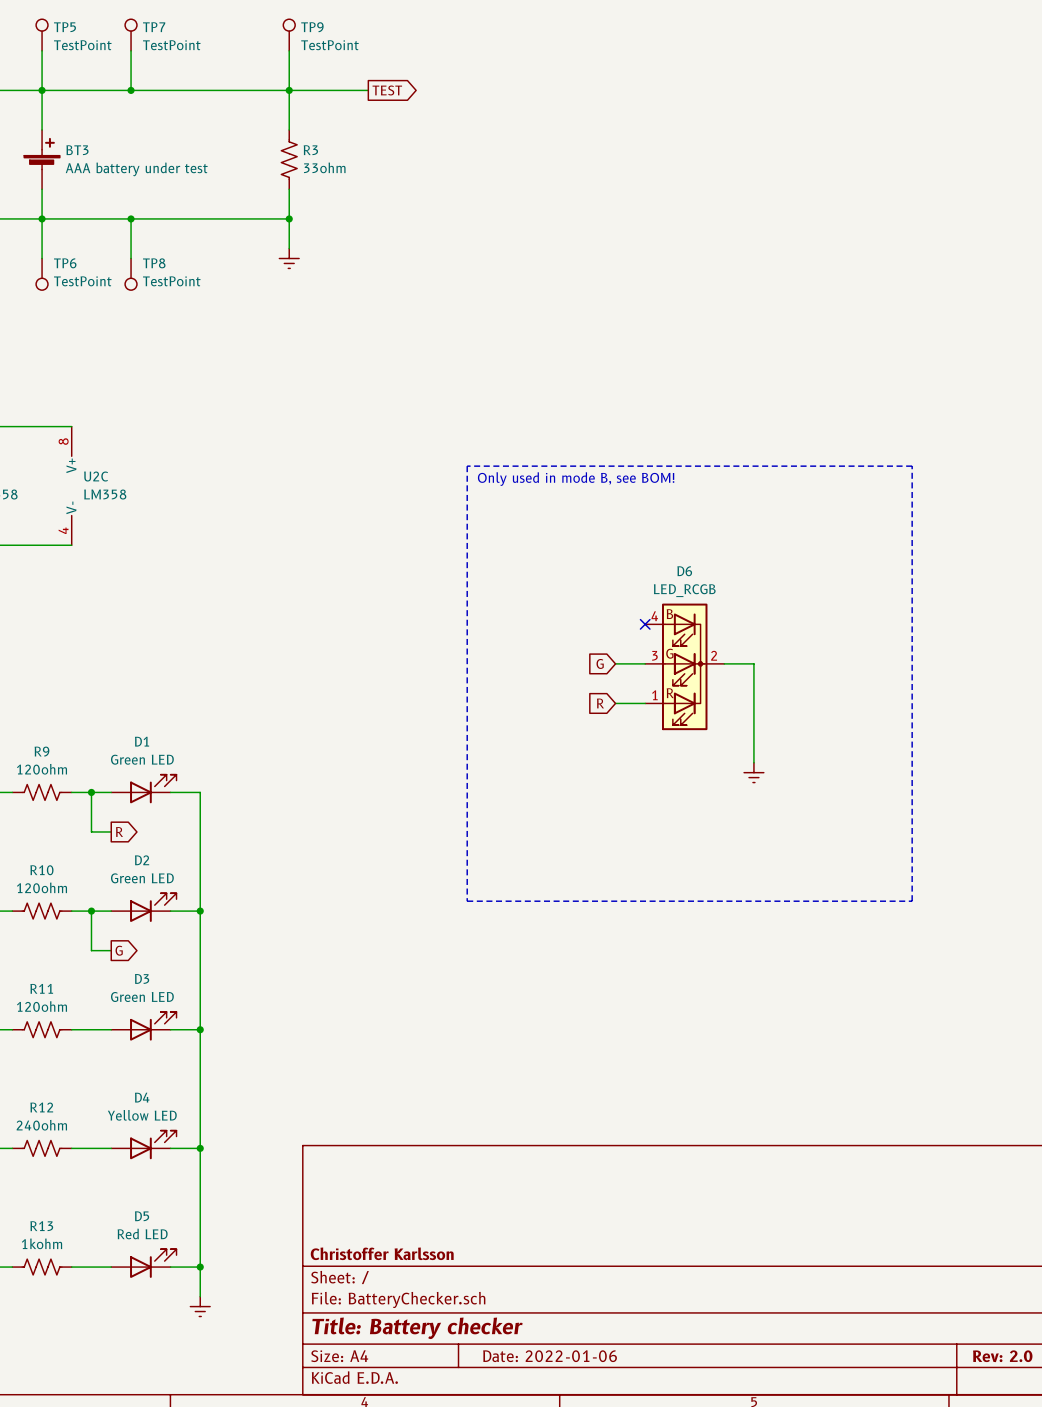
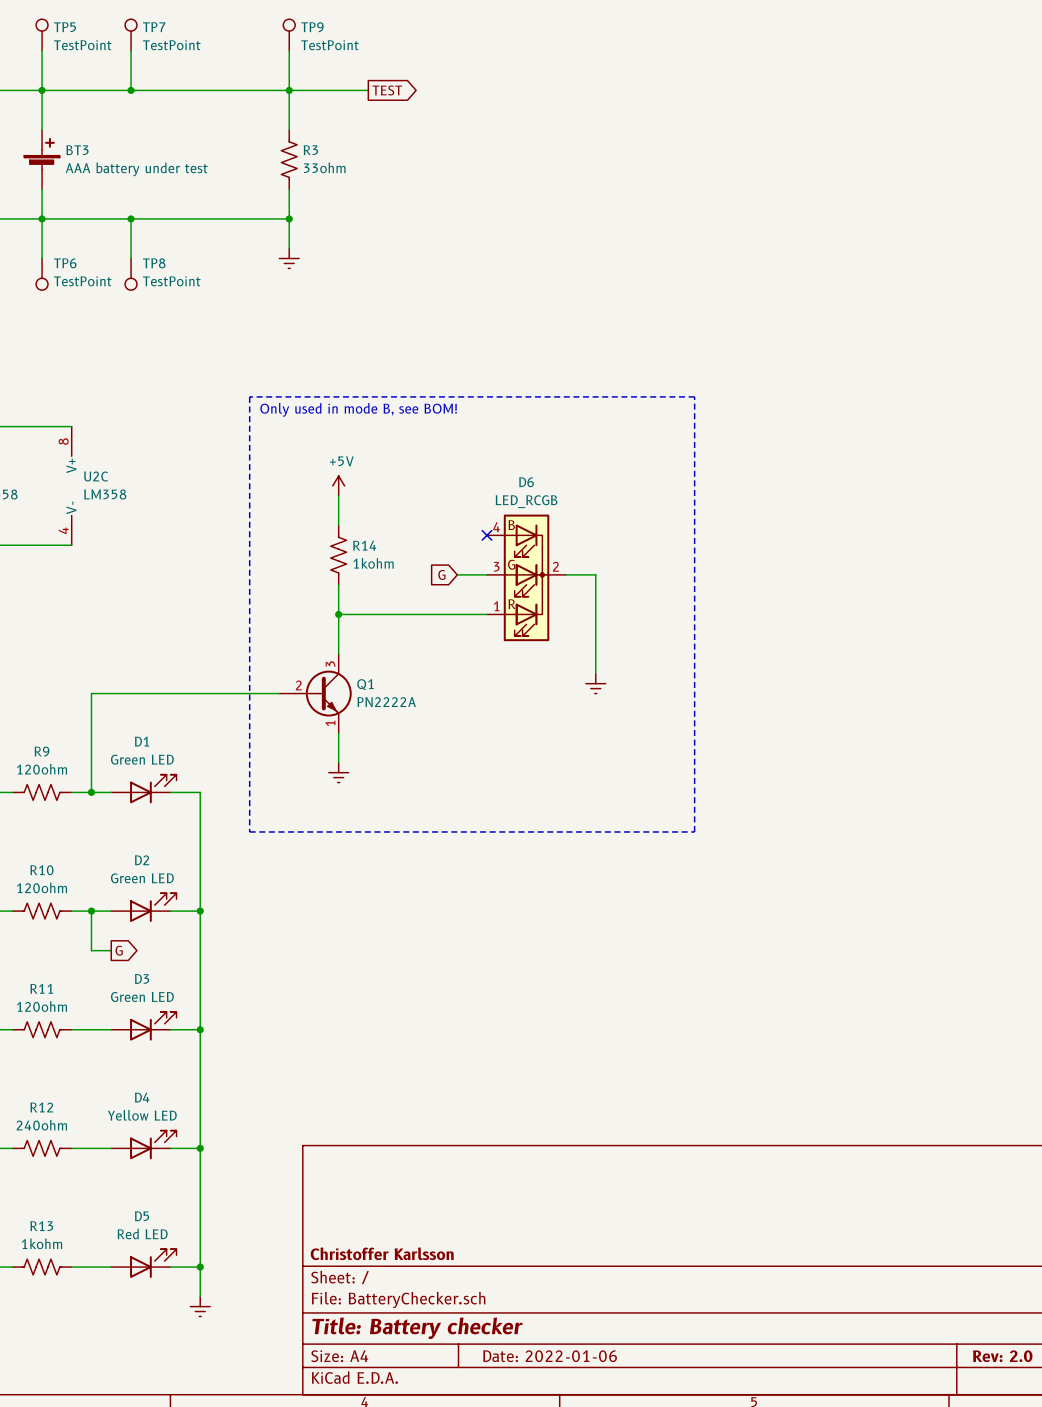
line: none -> (249, 396) (694, 396) (694, 831) (249, 831) (249, 396)
text: none -> Only used in mode B, see BOM! (358, 409)
line: (467, 466) (912, 466) (912, 901) (467, 901) (467, 466) -> none
text: Only used in mode B, see BOM! (576, 479) -> none
power symbol: none -> +5V (338, 485)
wire: none -> (338, 495) (338, 525)
no-connect mark: none -> (486, 535)
R14: none -> 1kohm (338, 555)
wire: none -> (338, 584) (338, 654)
wire: none -> (338, 614) (486, 614)
junction: none -> (338, 614)
no-connect mark: (645, 624) -> none
global label position: G (600, 663) -> G (441, 574)
wire: (615, 663) (645, 663) -> (457, 574) (486, 574)
wire: (724, 663) (753, 663) (753, 762) -> (566, 574) (595, 574) (595, 673)
D6 position: (684, 666) -> (526, 577)
Q1: none -> PN2222A (315, 693)
global label: R (600, 703) -> none
wire: (615, 703) (645, 703) -> none
wire: none -> (338, 733) (338, 762)
power symbol: none -> (338, 772)
power symbol position: (753, 772) -> (595, 683)
wire: (91, 792) (91, 831) (111, 831) -> (91, 792) (91, 693) (279, 693)
global label: R (119, 832) -> none

